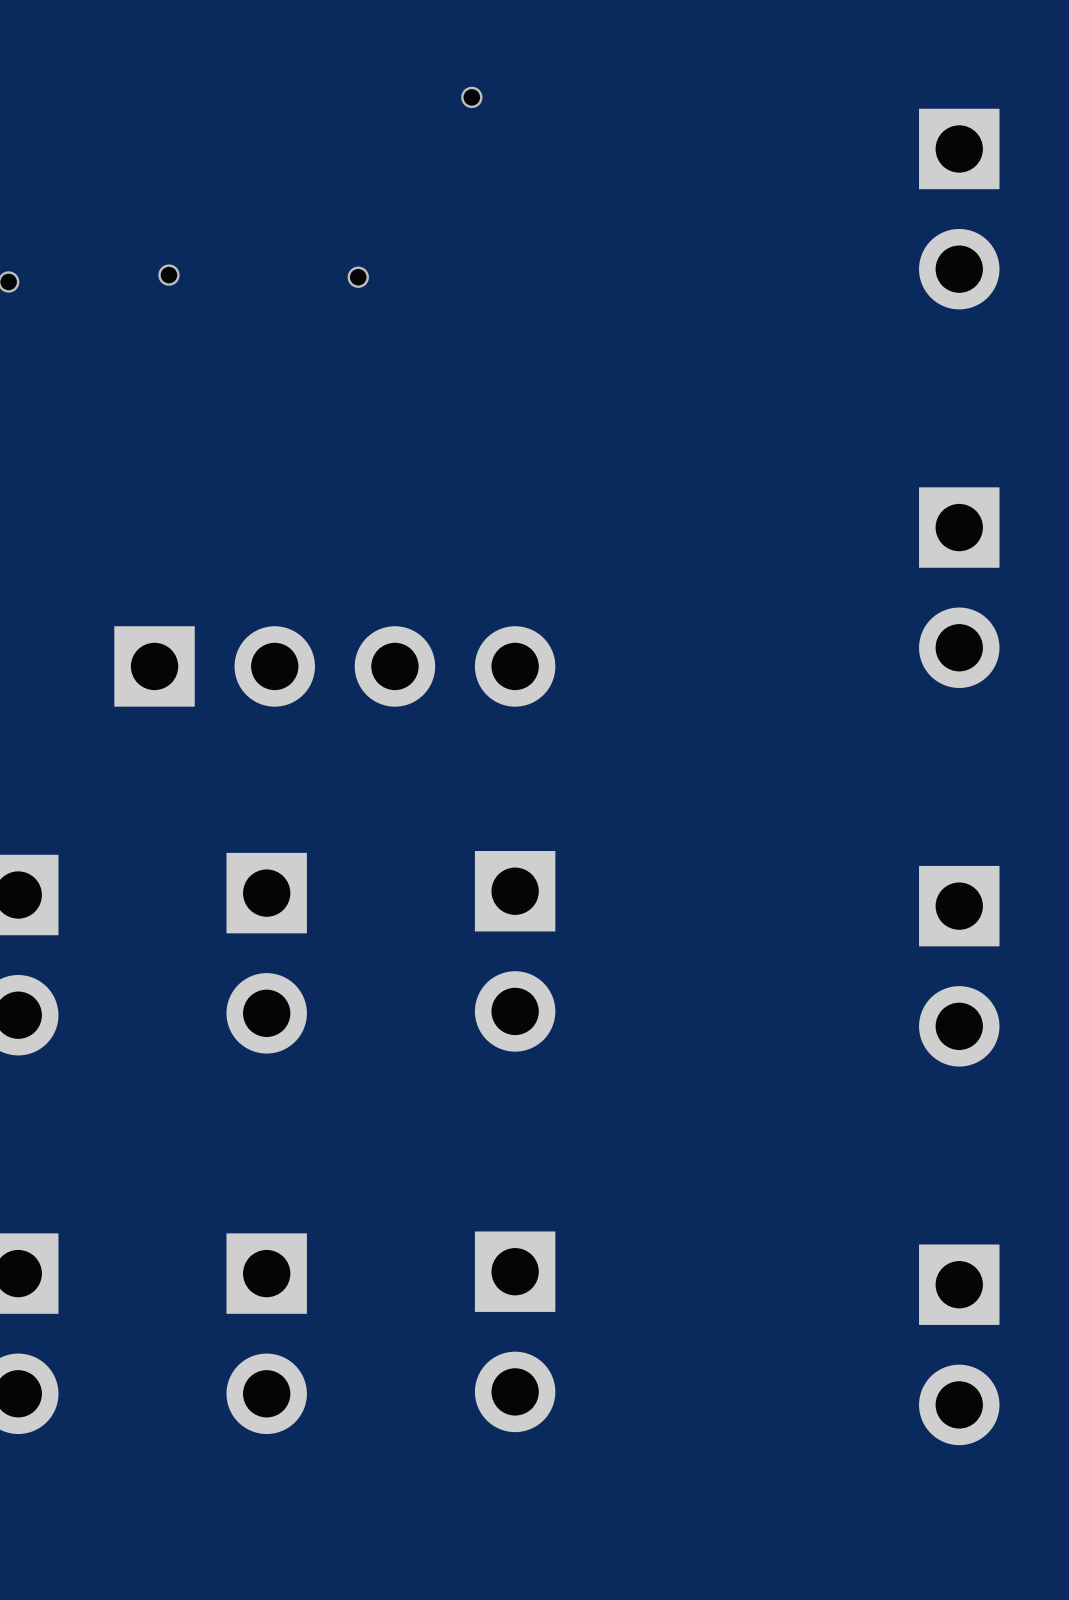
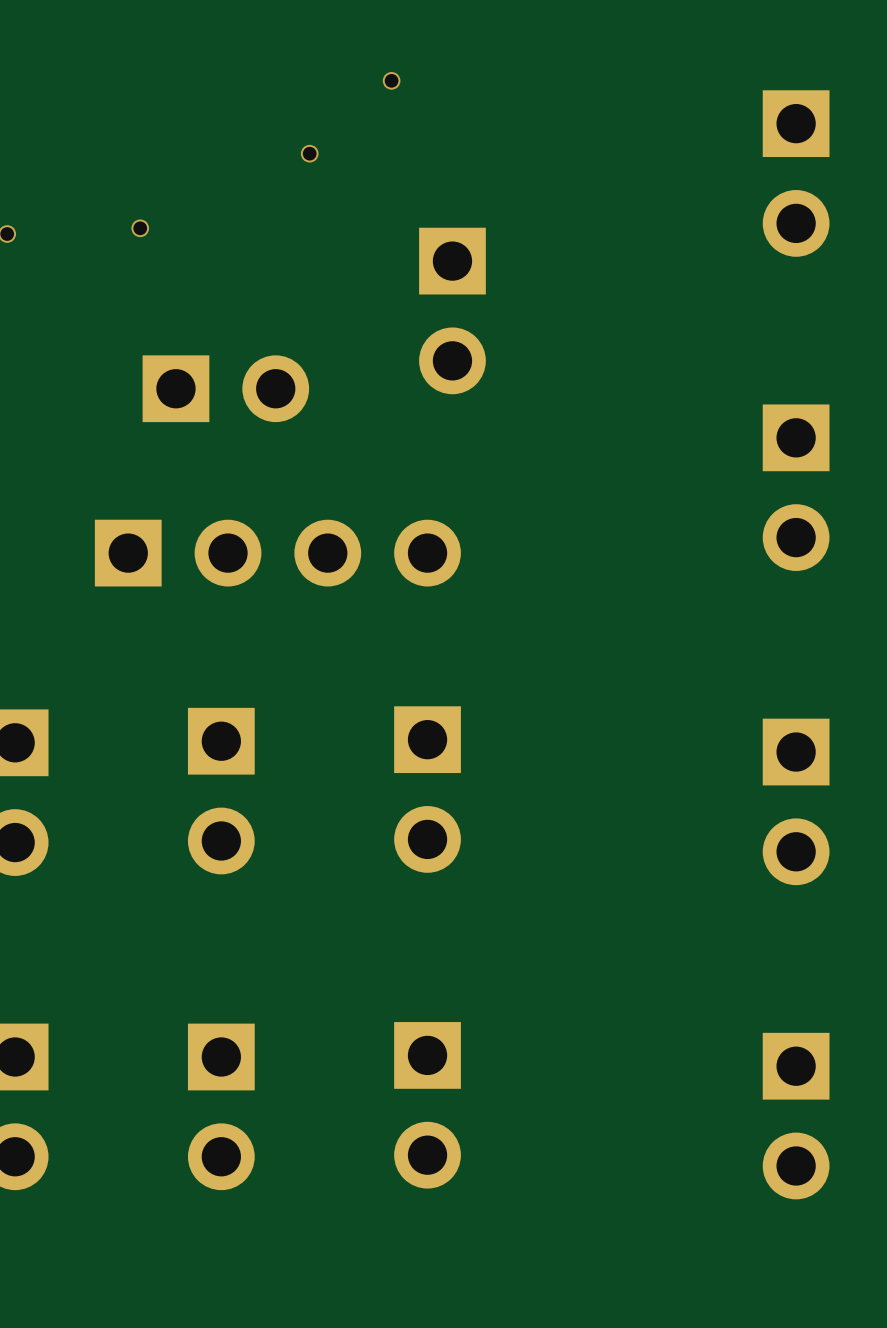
via position: (358, 277) -> (309, 153)
part: none -> (452, 310)
part: none -> (225, 388)

